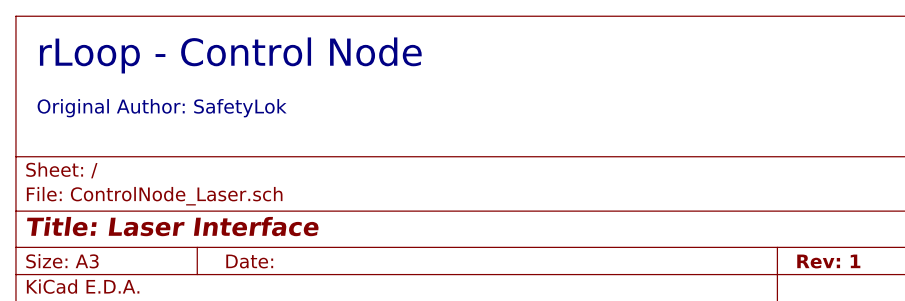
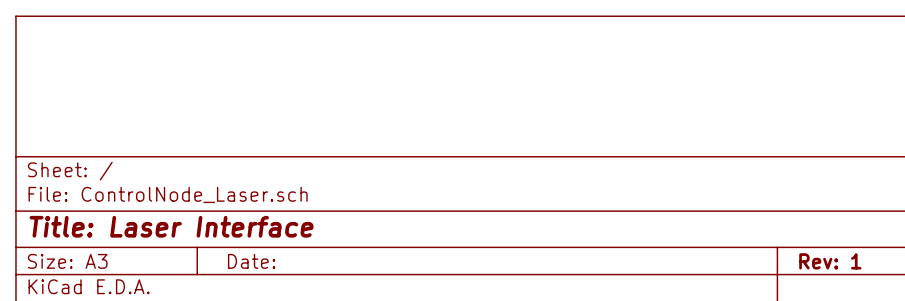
text: rLoop - Control Node (230, 55) -> none
text: Original Author: SafetyLok (162, 108) -> none

